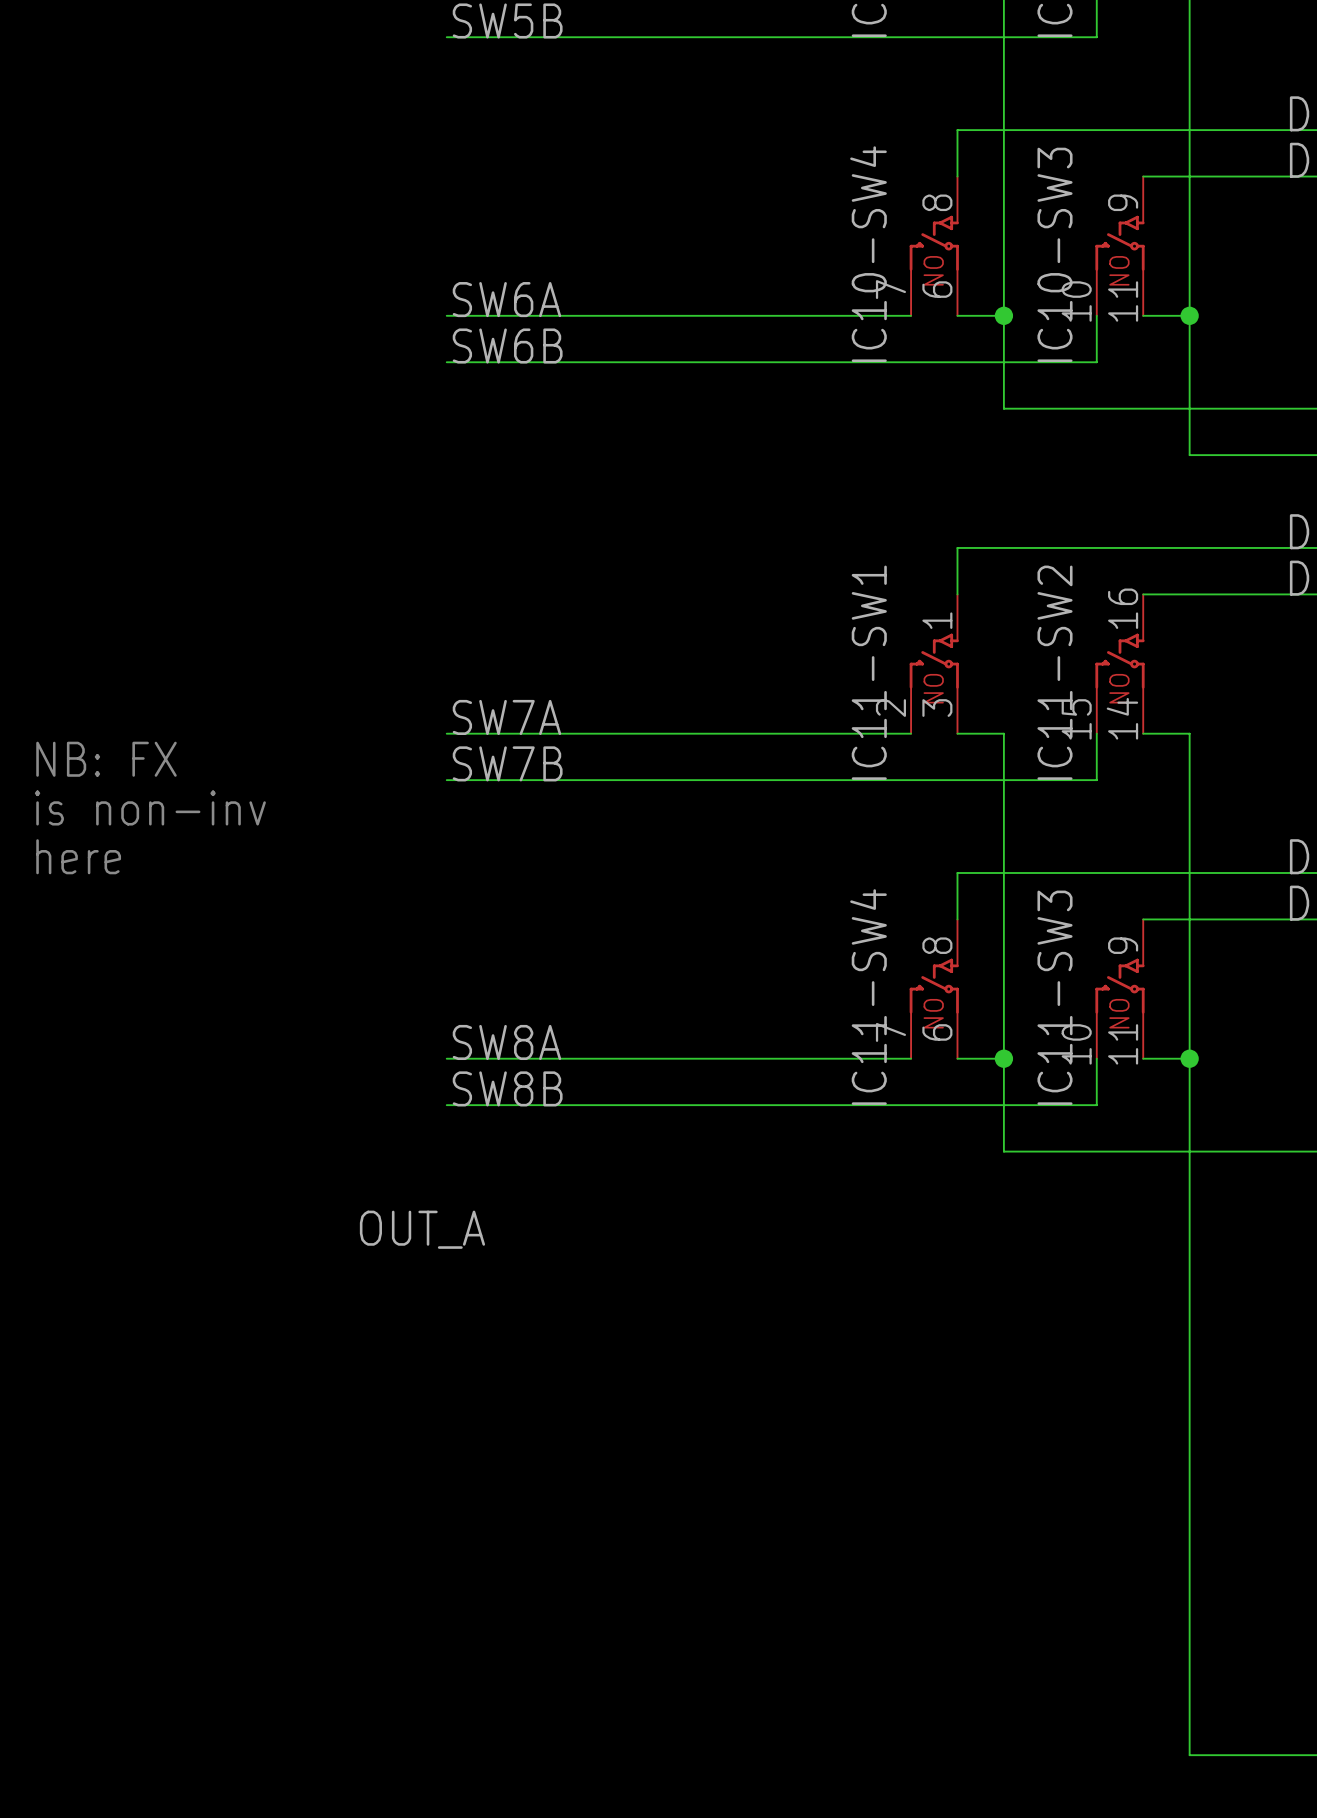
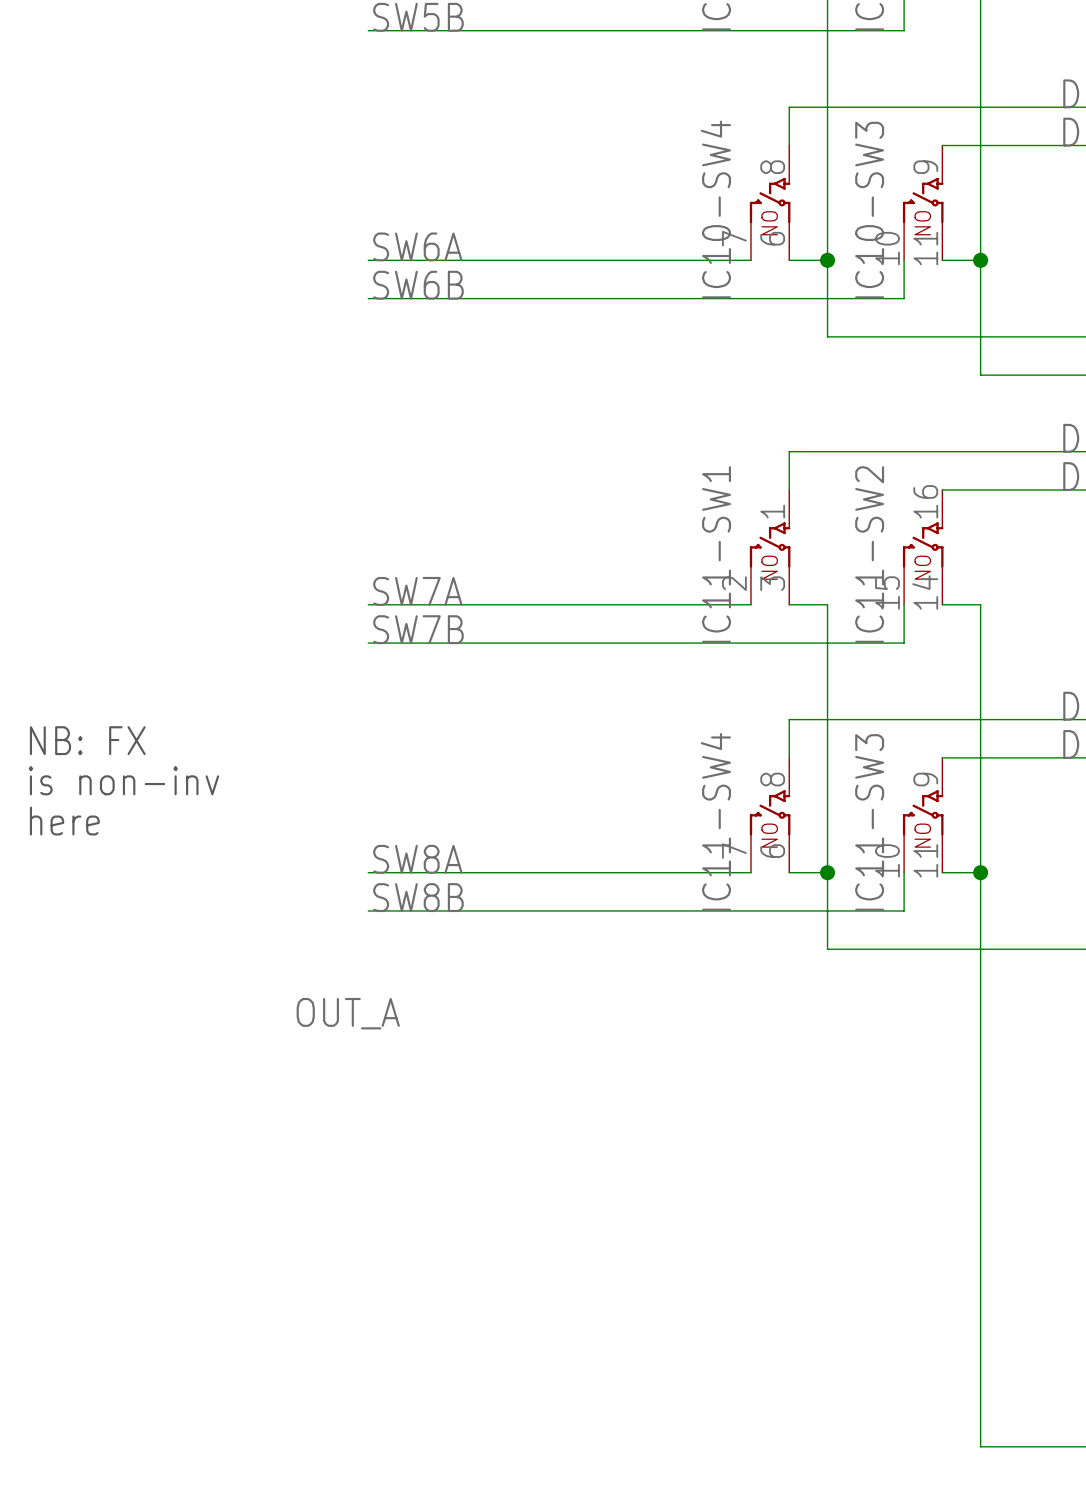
text position: NB: FX (106, 759) -> NB: FX (87, 740)
text position: is non-inv (150, 807) -> is non-inv (123, 780)
text position: here (78, 856) -> here (64, 821)

